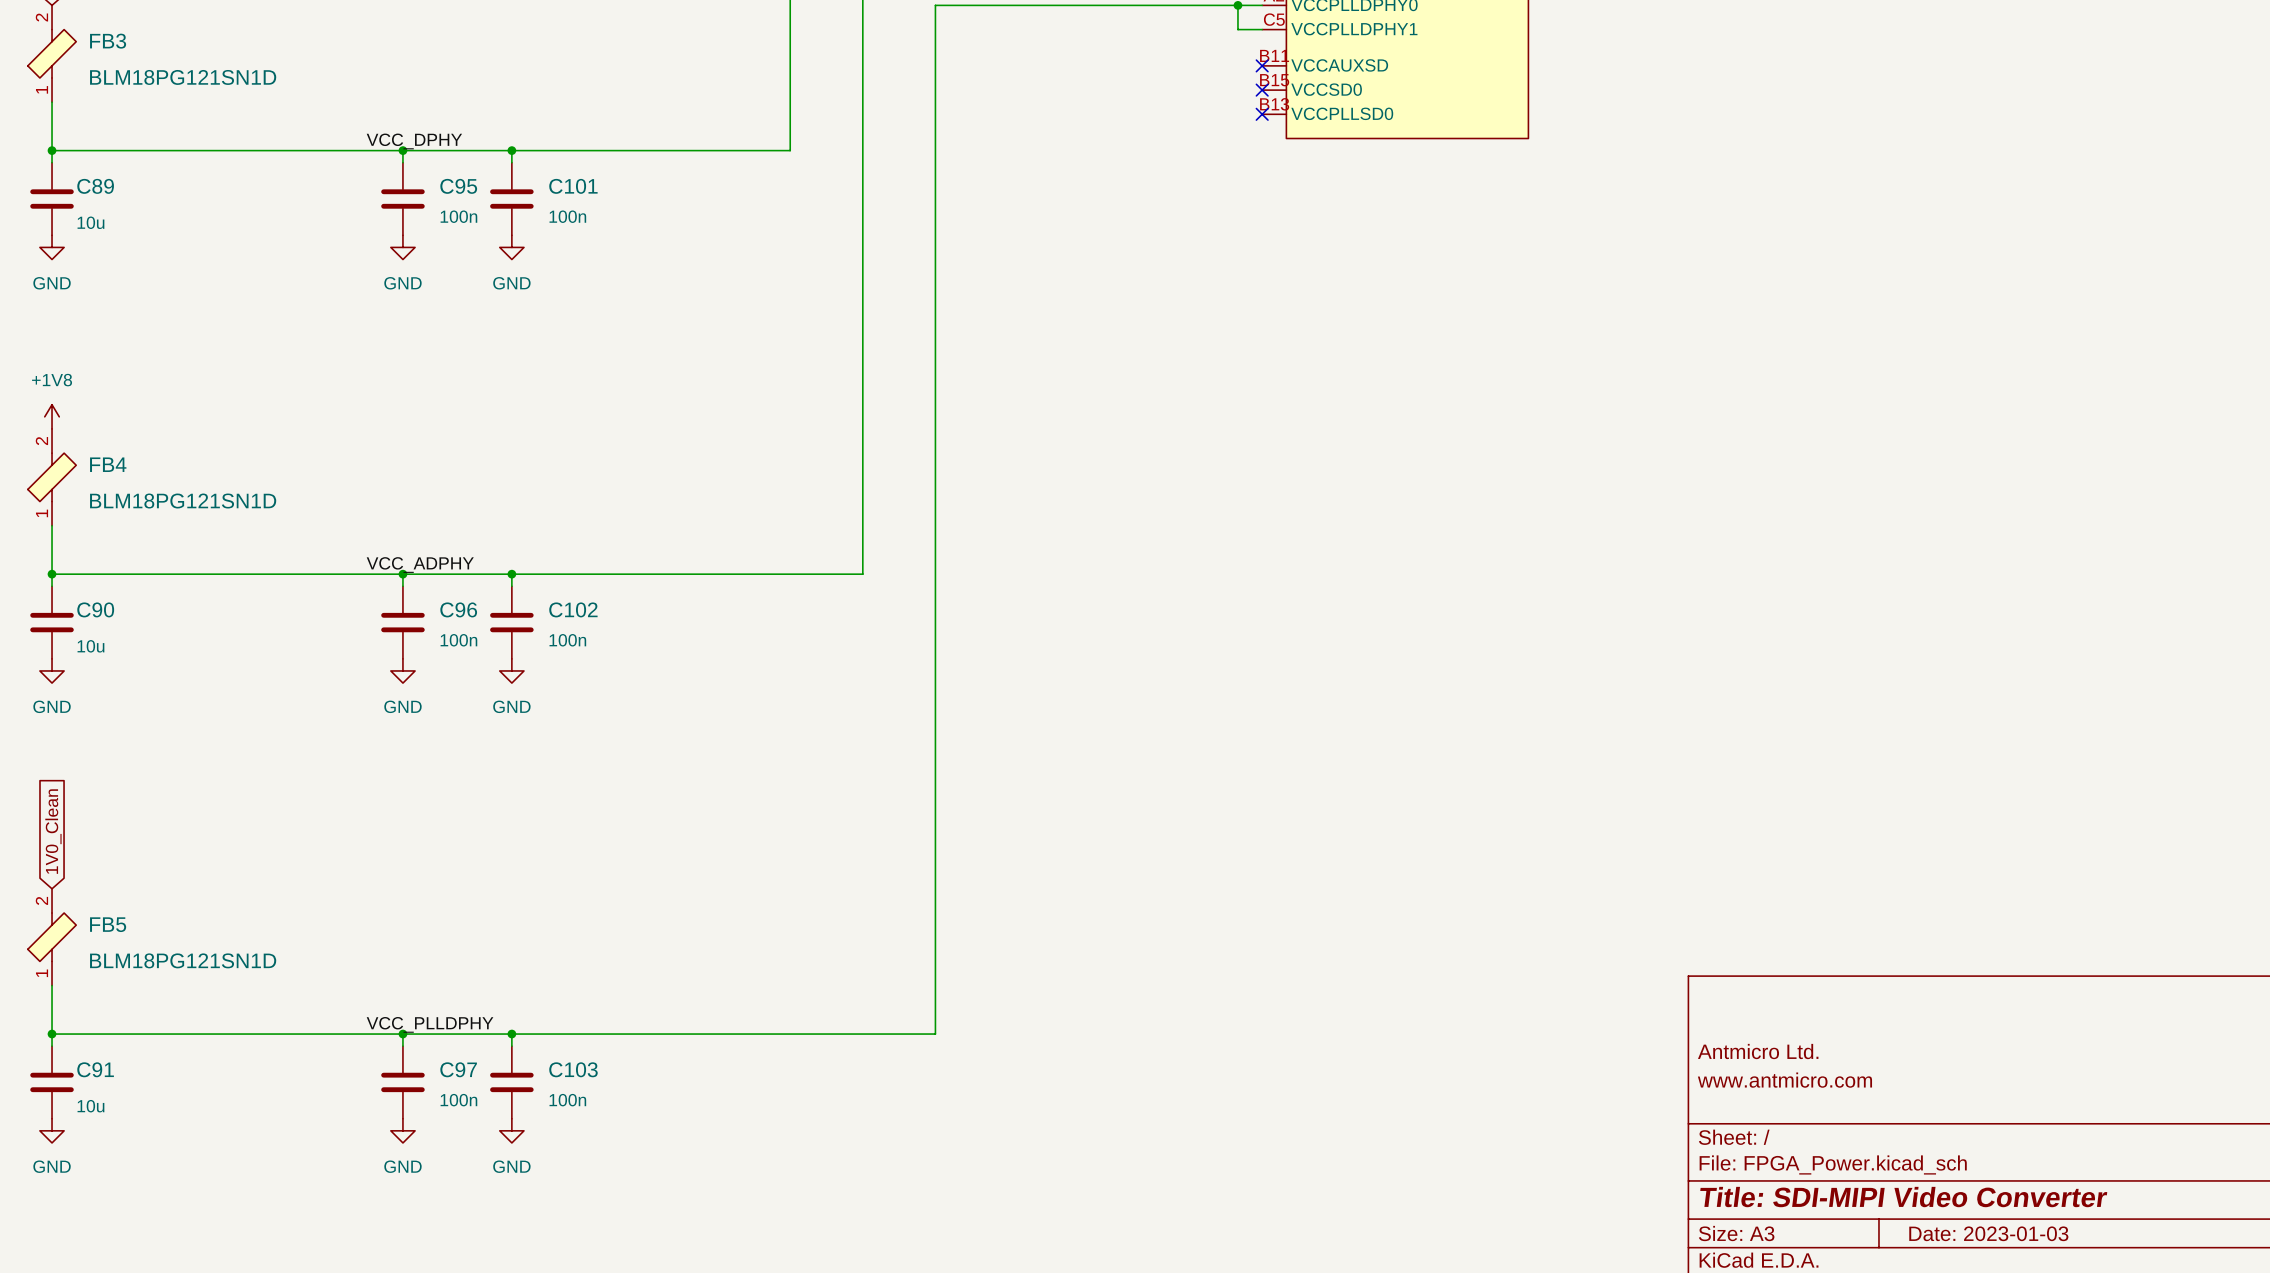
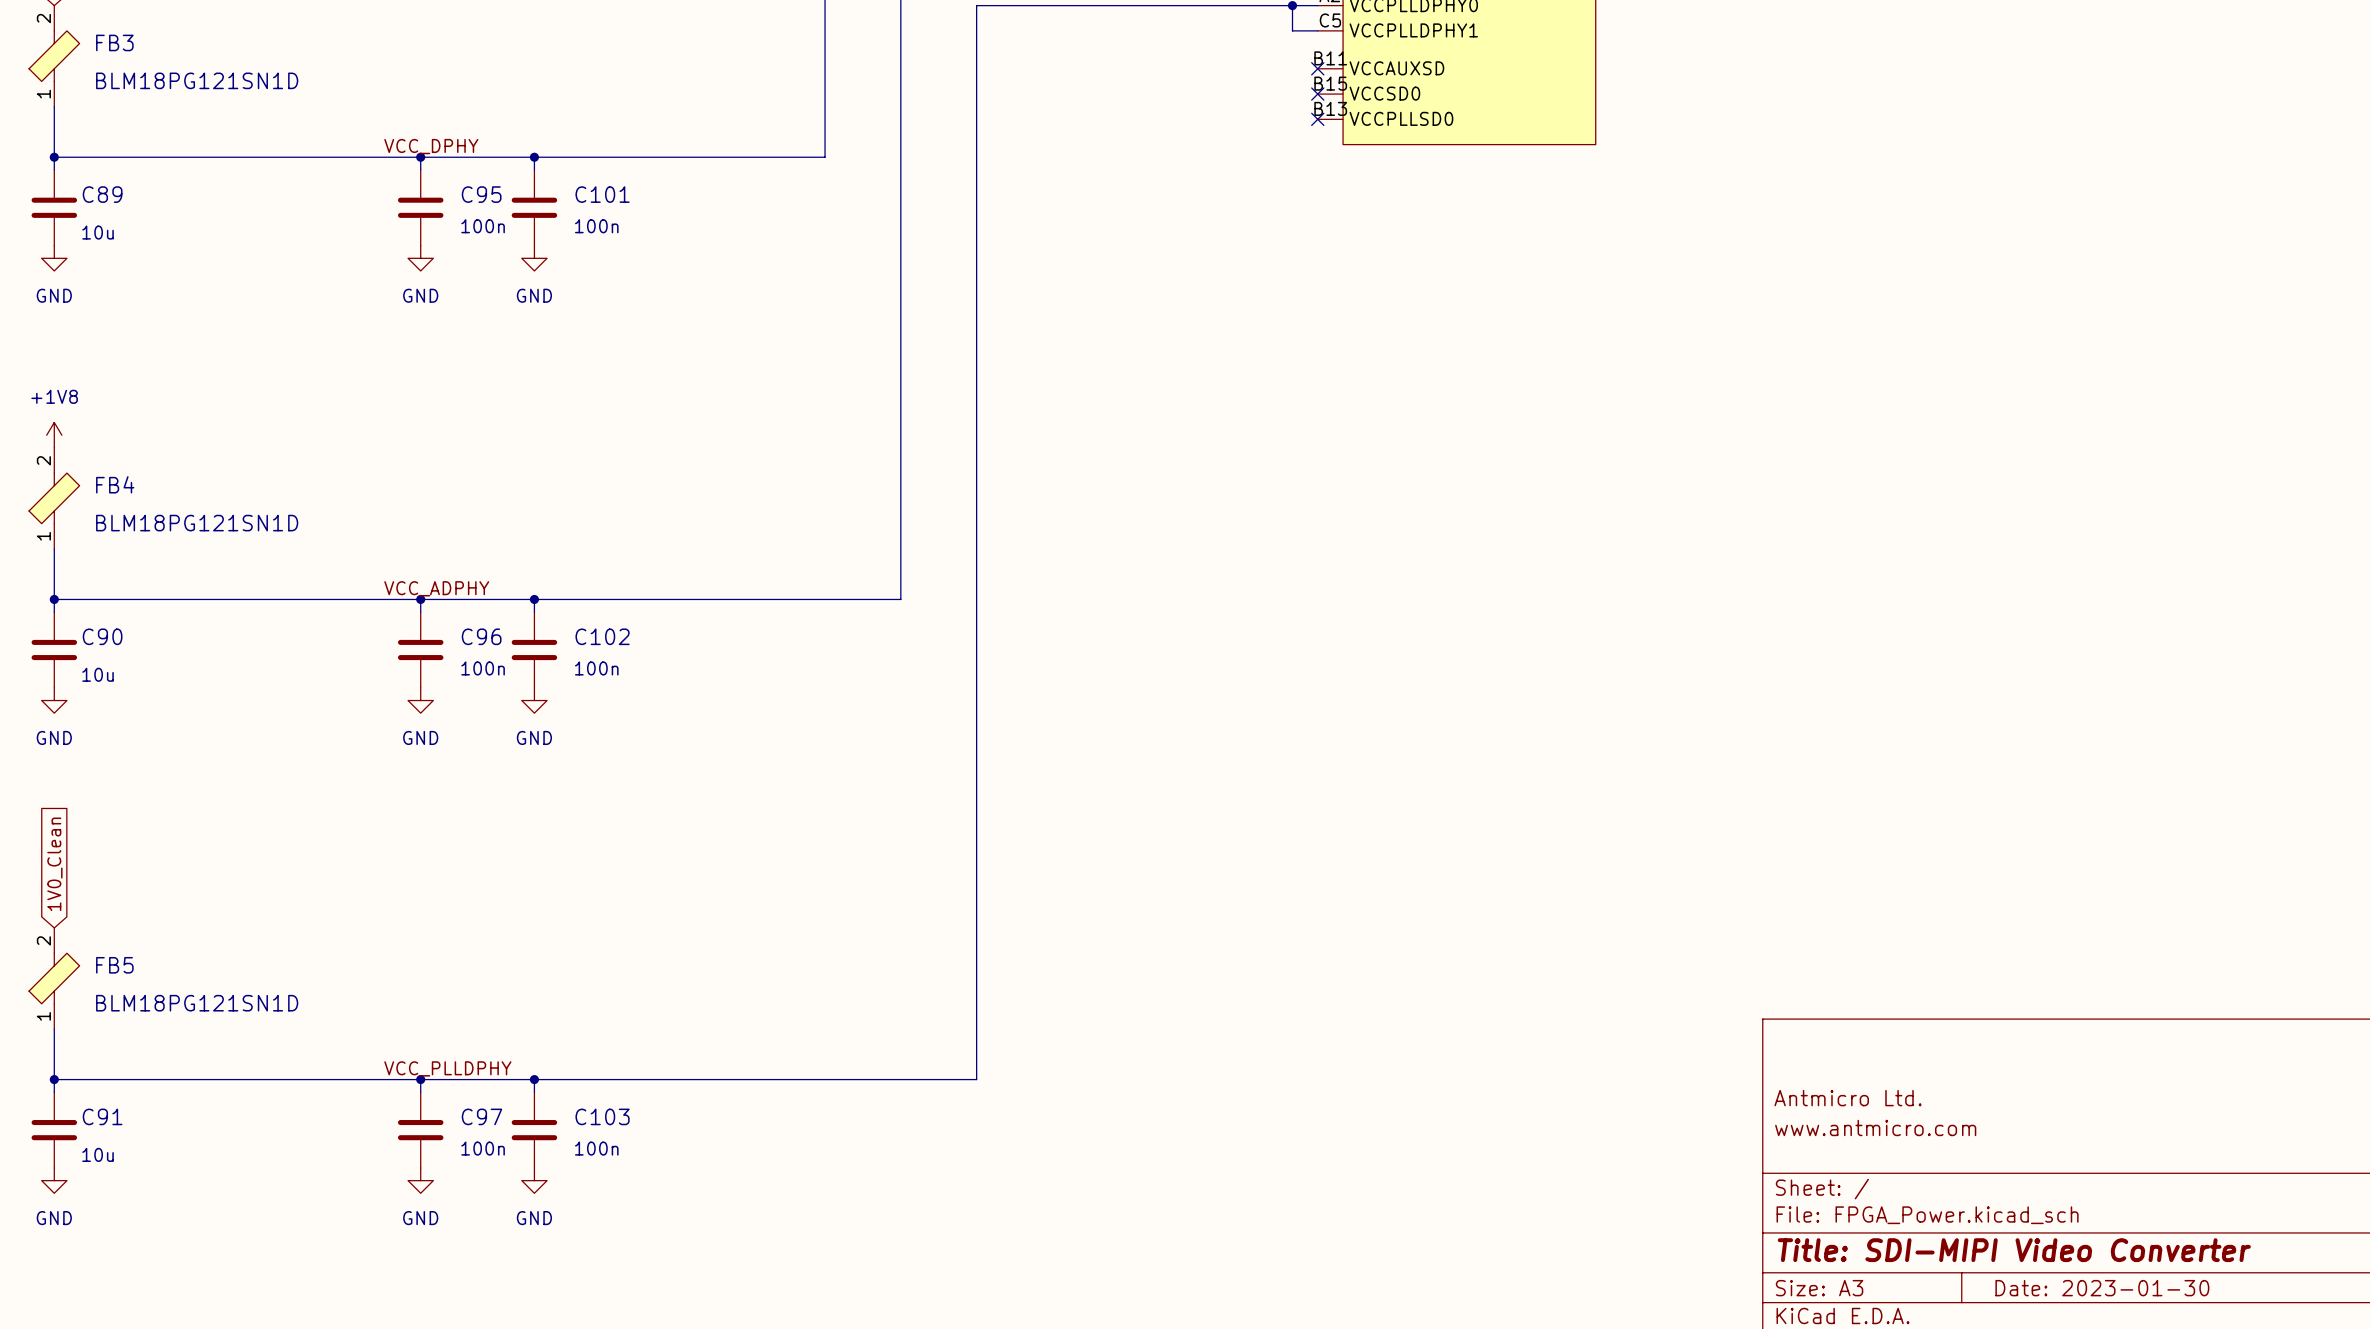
title block: Date: 2023-01-03 (1988, 1233) -> Date: 2023-01-30 (2102, 1288)

